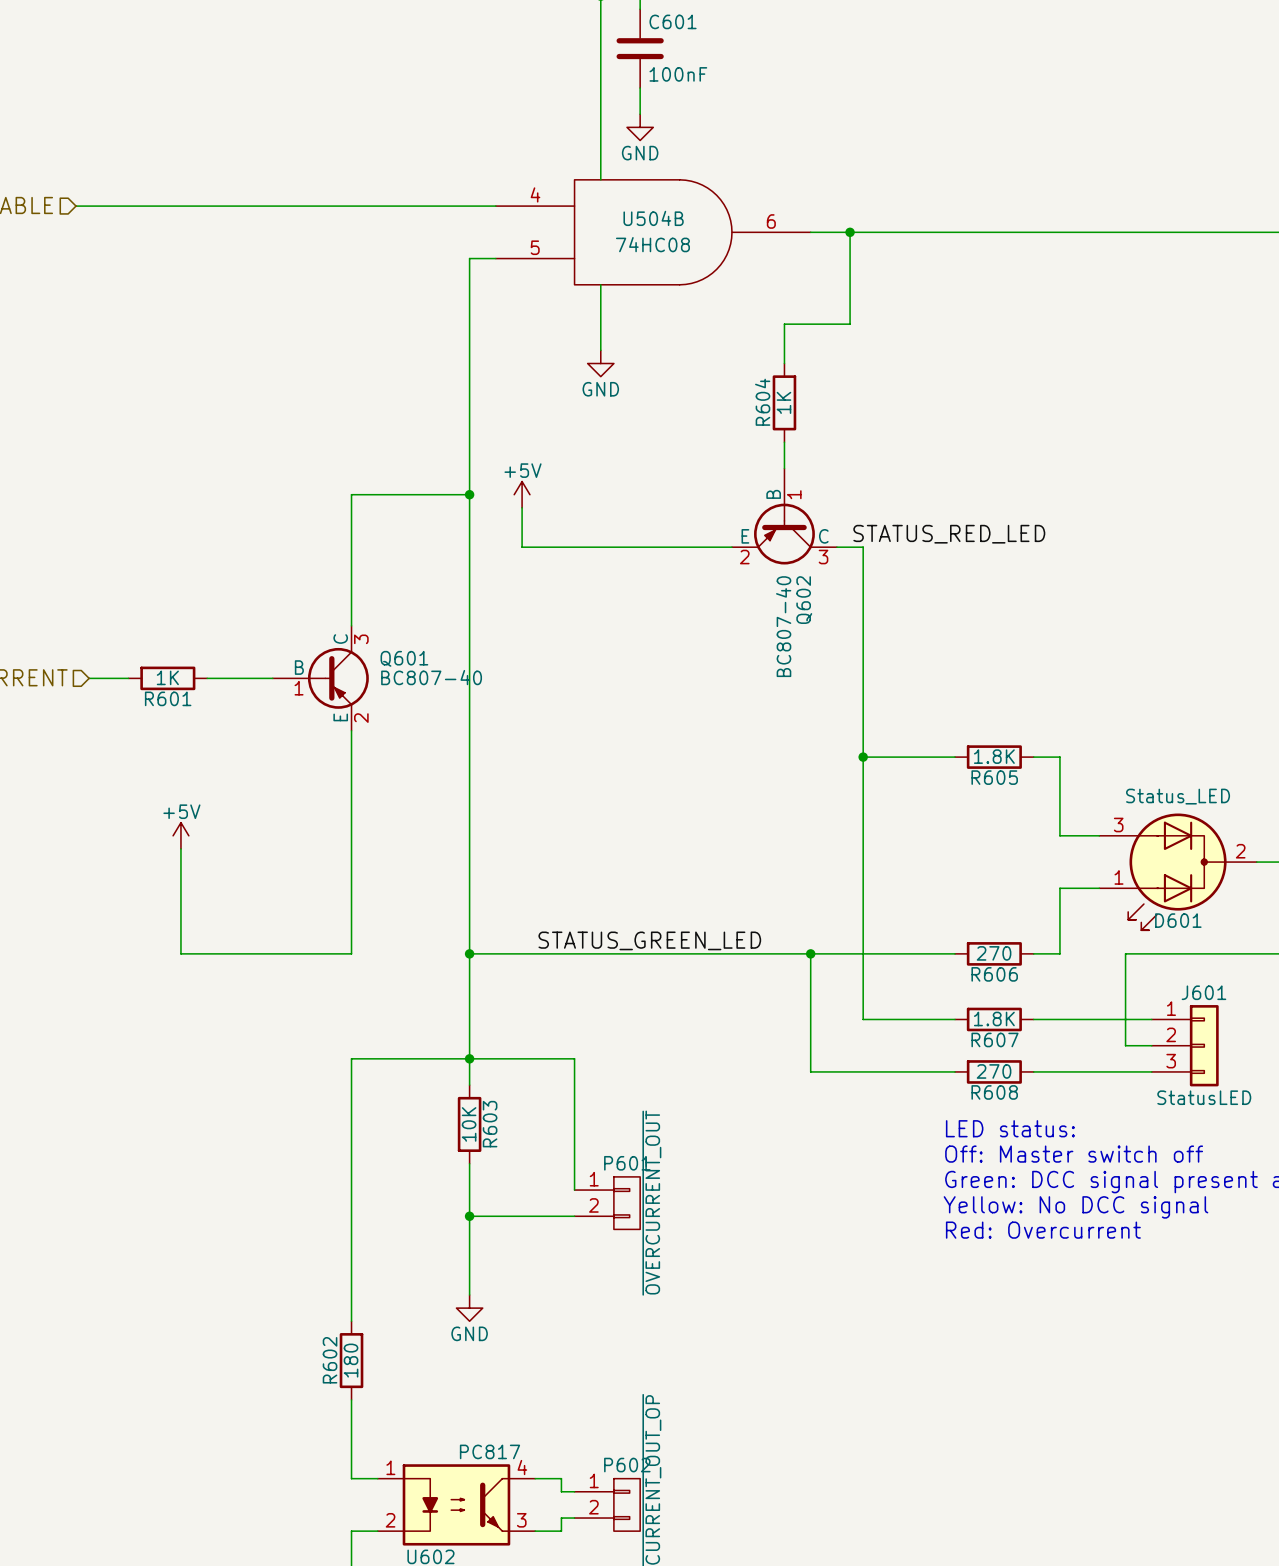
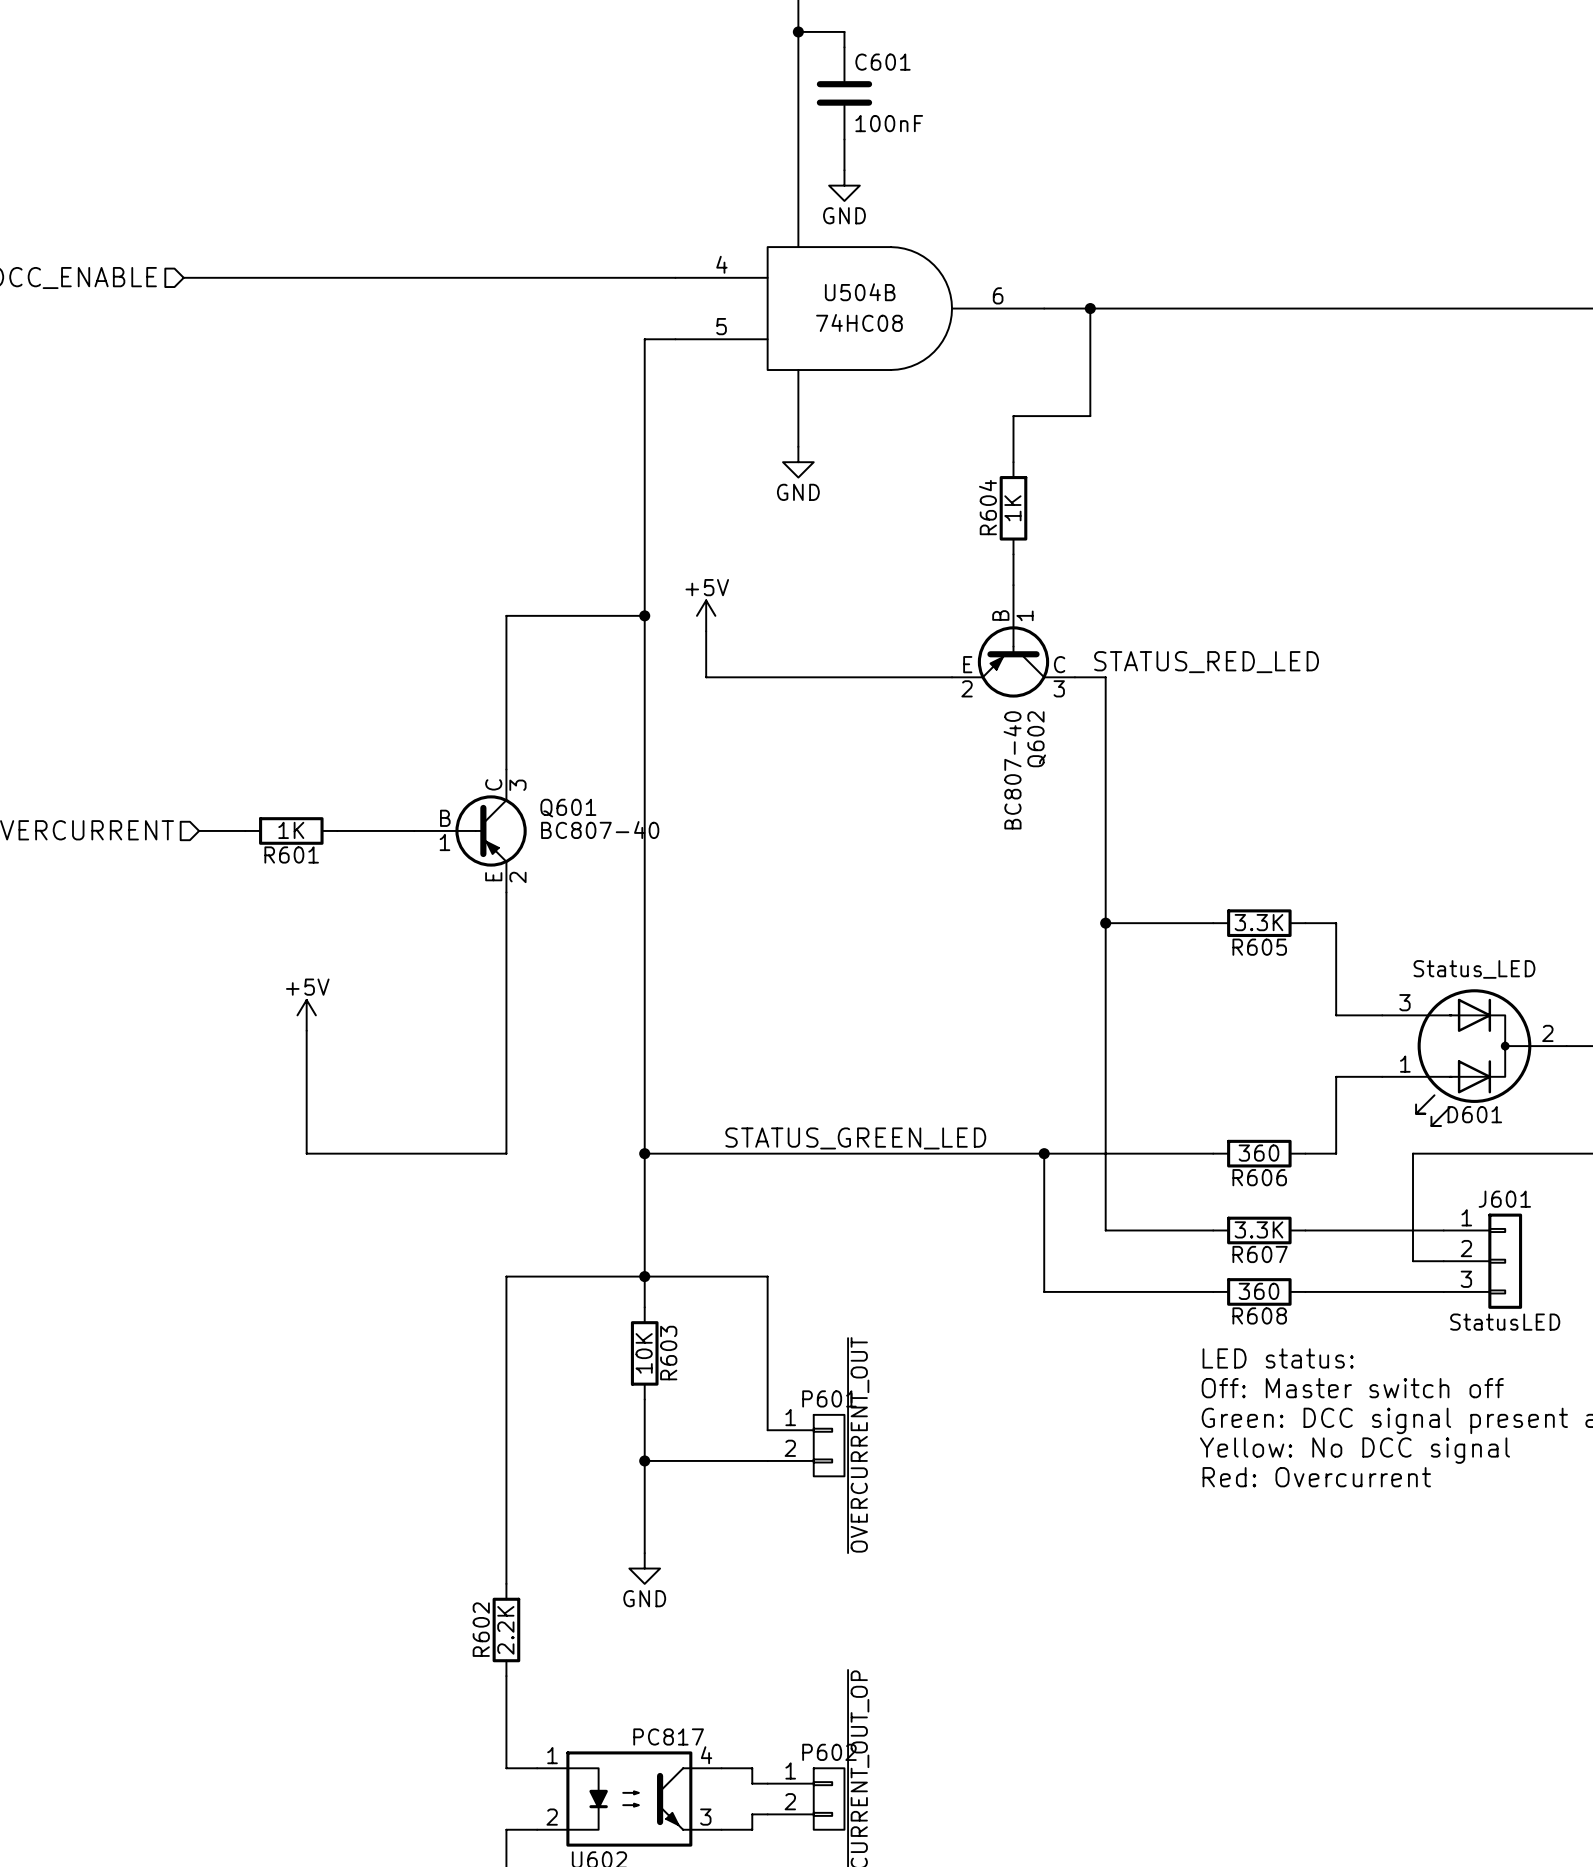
R605 value: 1.8K (994, 756) -> 3.3K (1258, 922)
R606 value: 270 (994, 953) -> 360 (1258, 1153)
R607 value: 1.8K (994, 1018) -> 3.3K (1258, 1229)
R608 value: 270 (994, 1071) -> 360 (1258, 1291)
R602 value: 180 (351, 1360) -> 2.2K (505, 1630)

